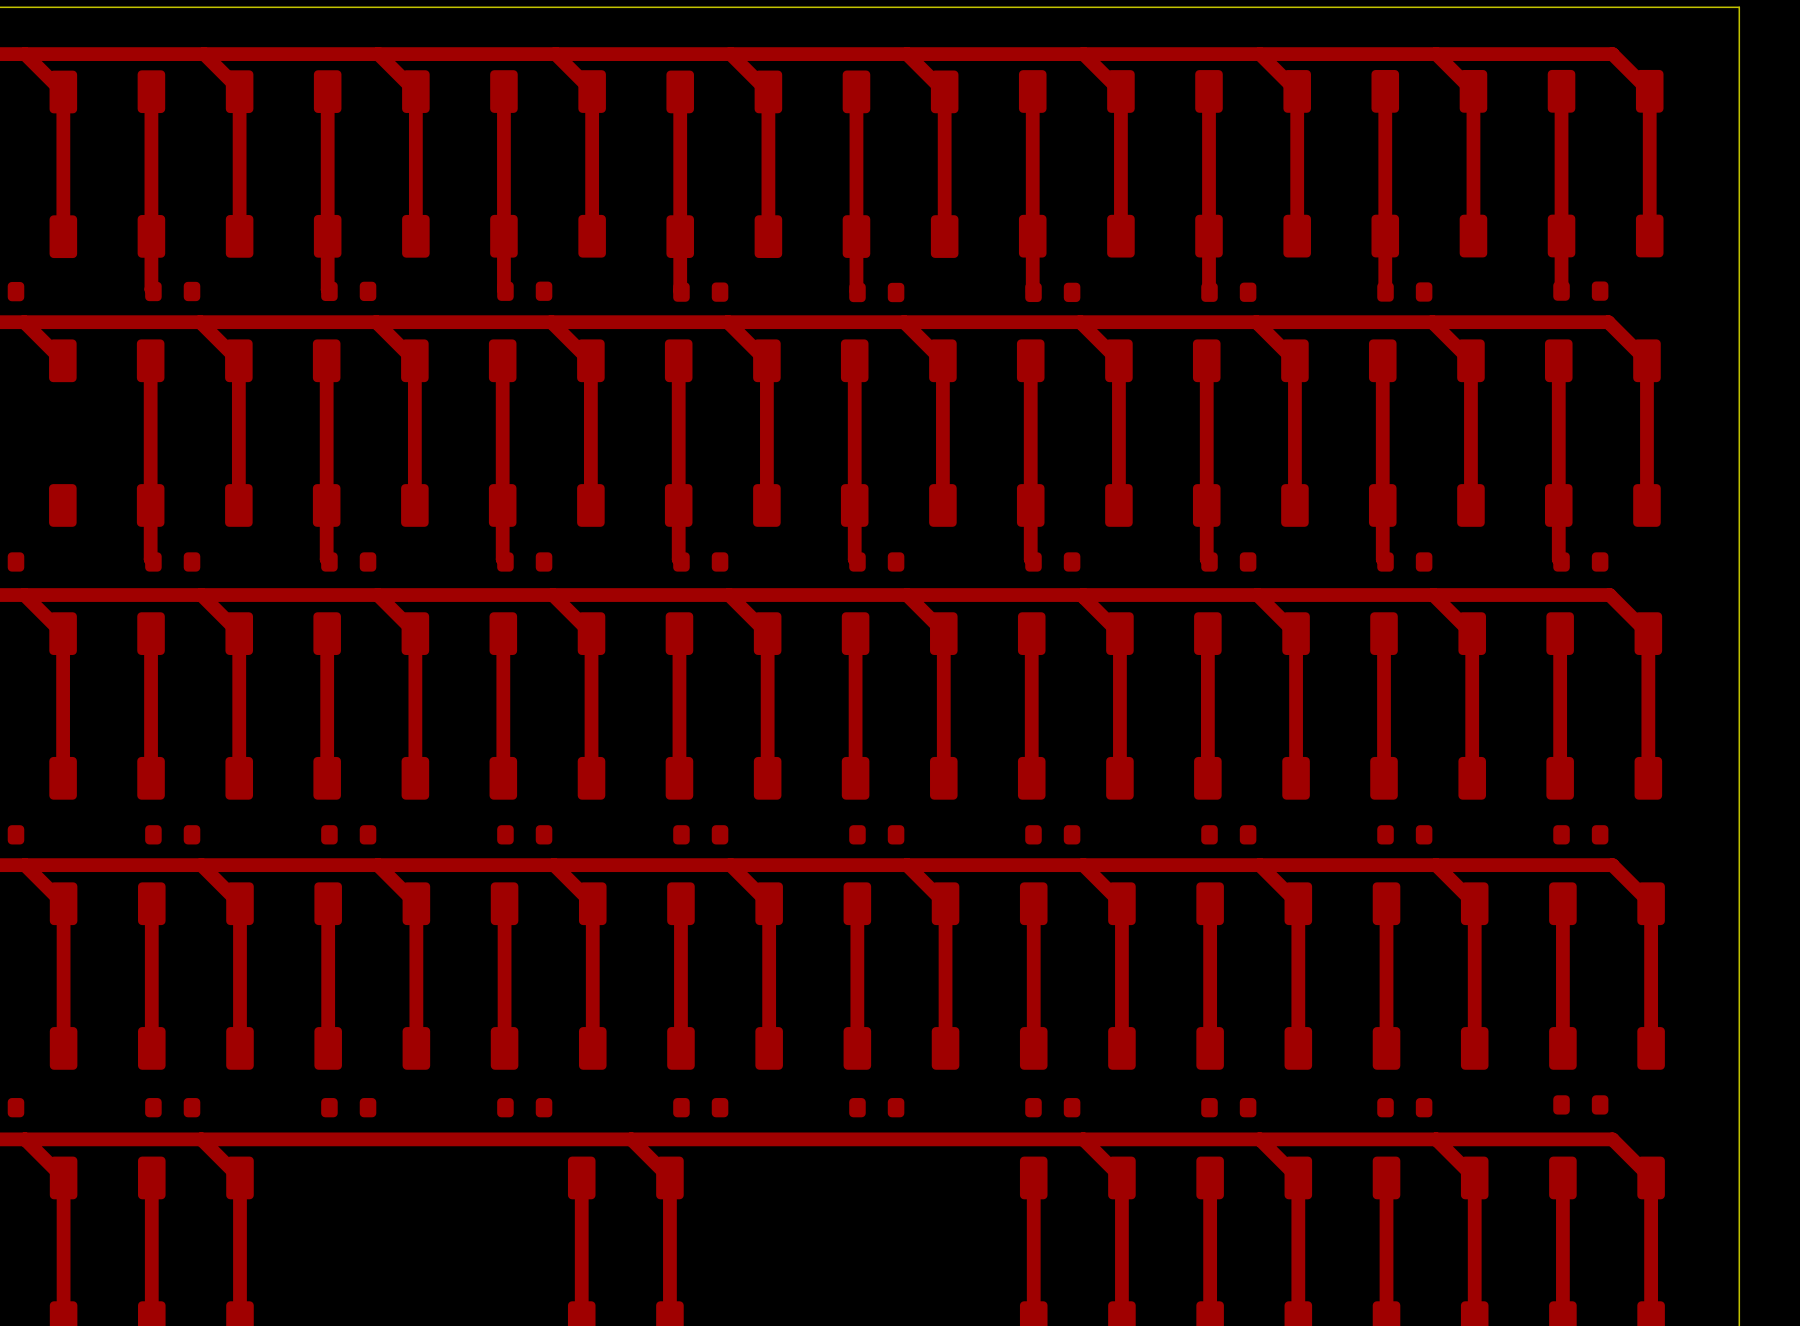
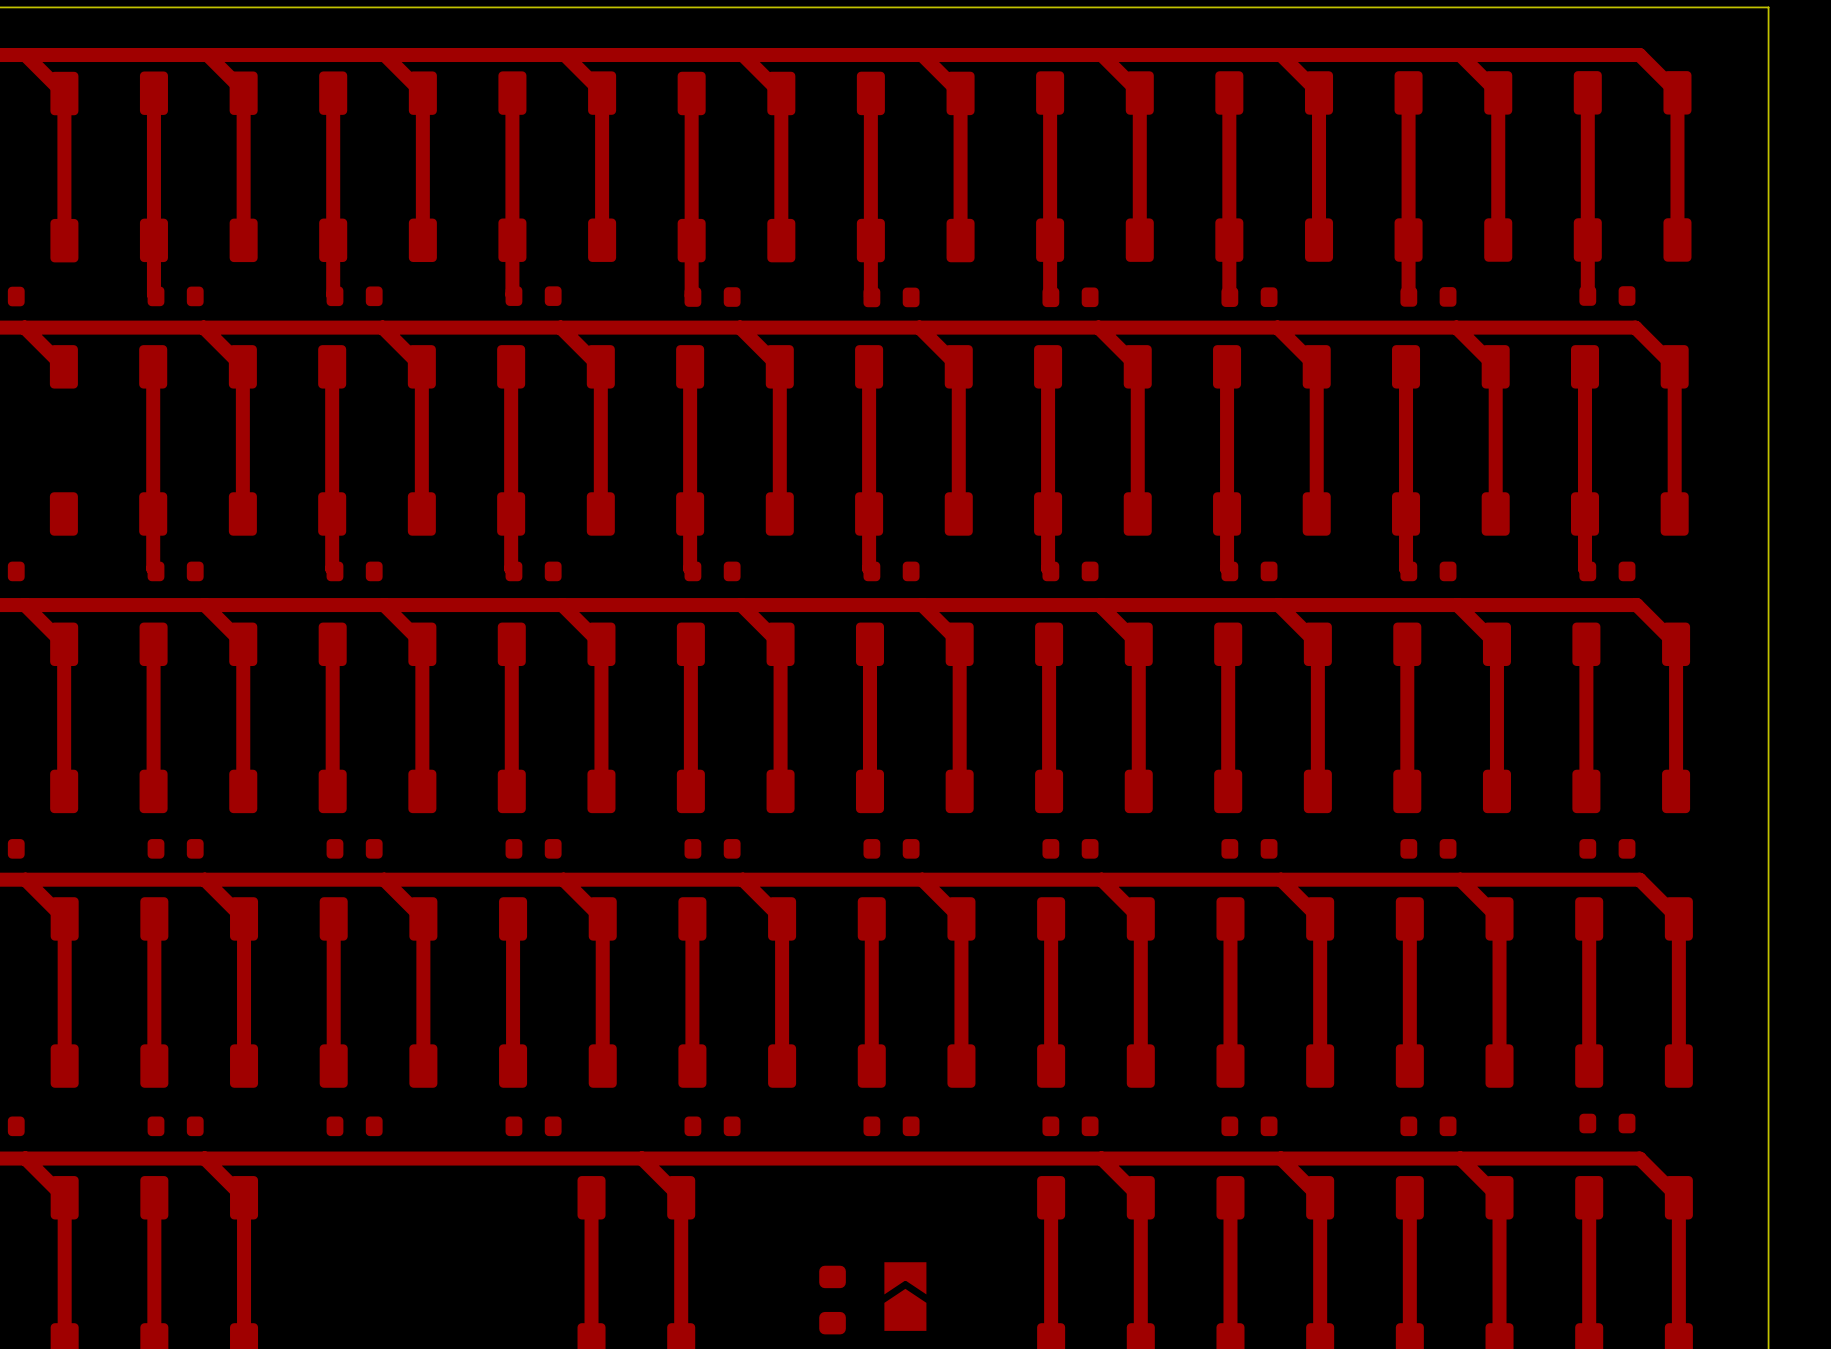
part: none -> (905, 1296)
part: none -> (832, 1300)

